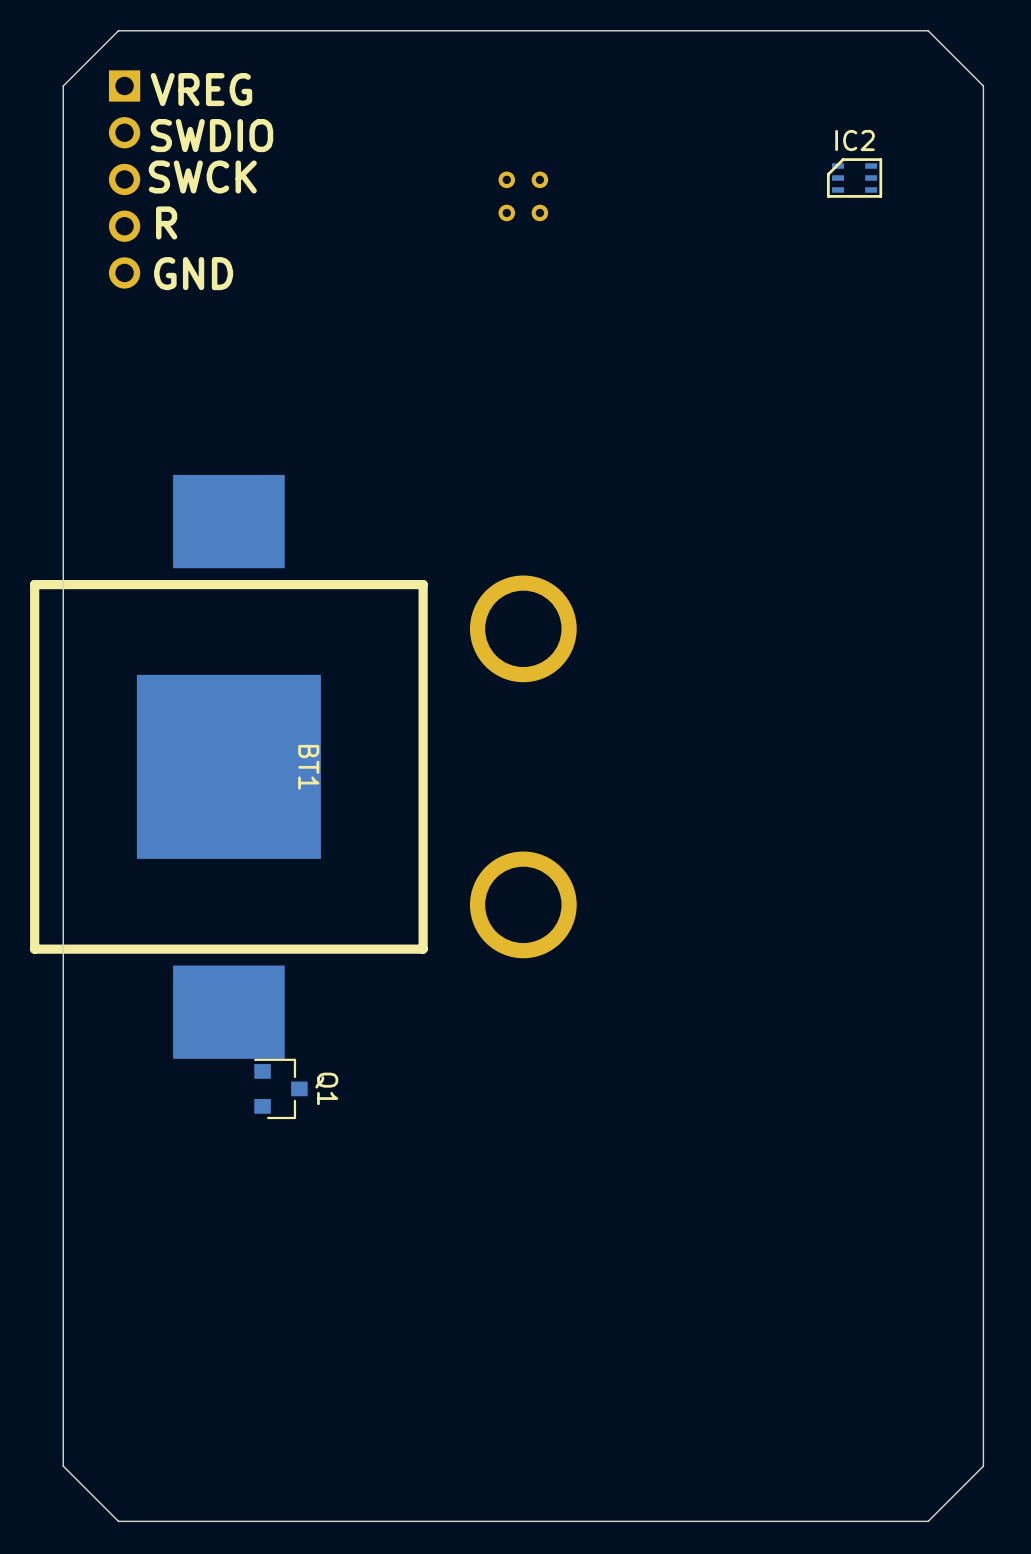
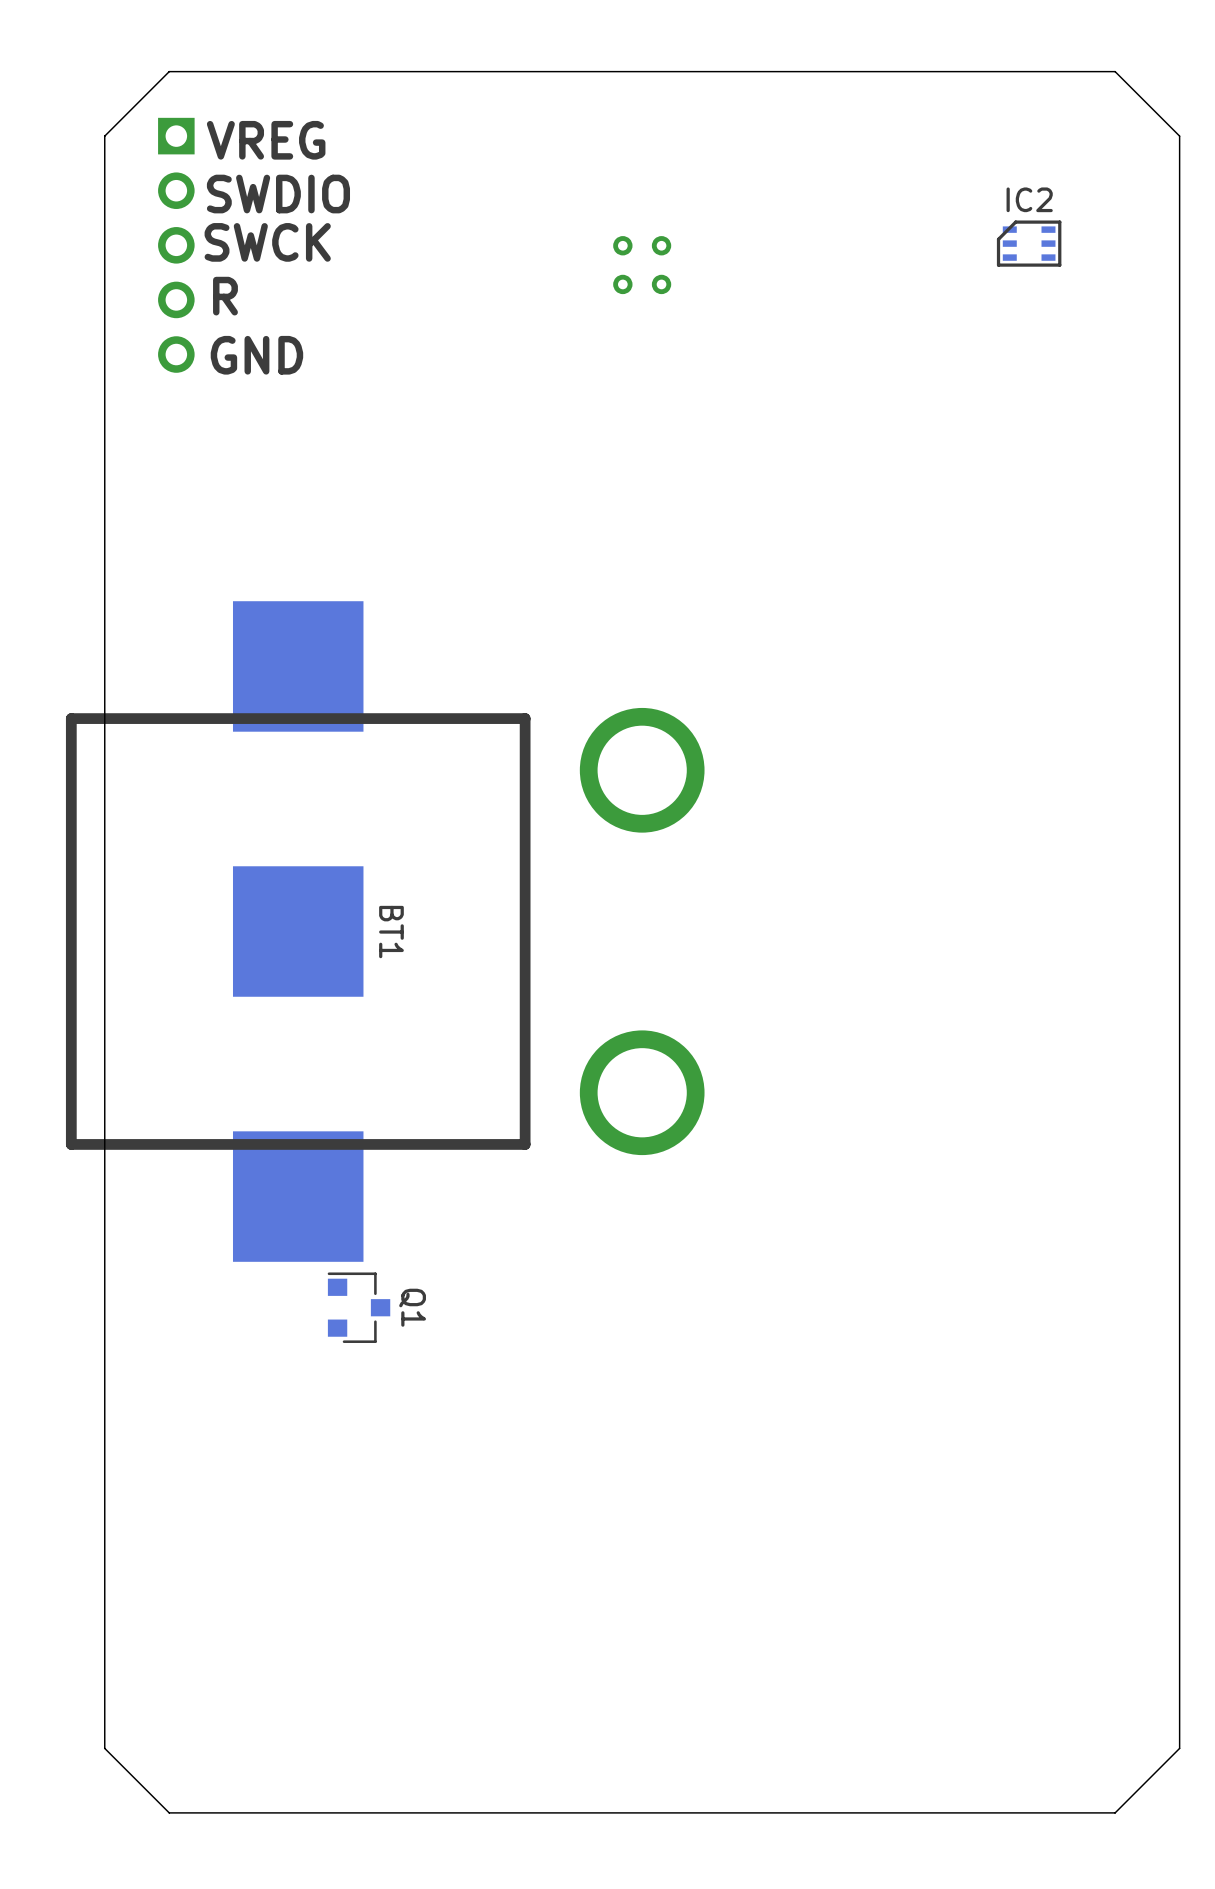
BT1 footprint: [30, 474, 428, 1059] -> [65, 601, 531, 1262]

